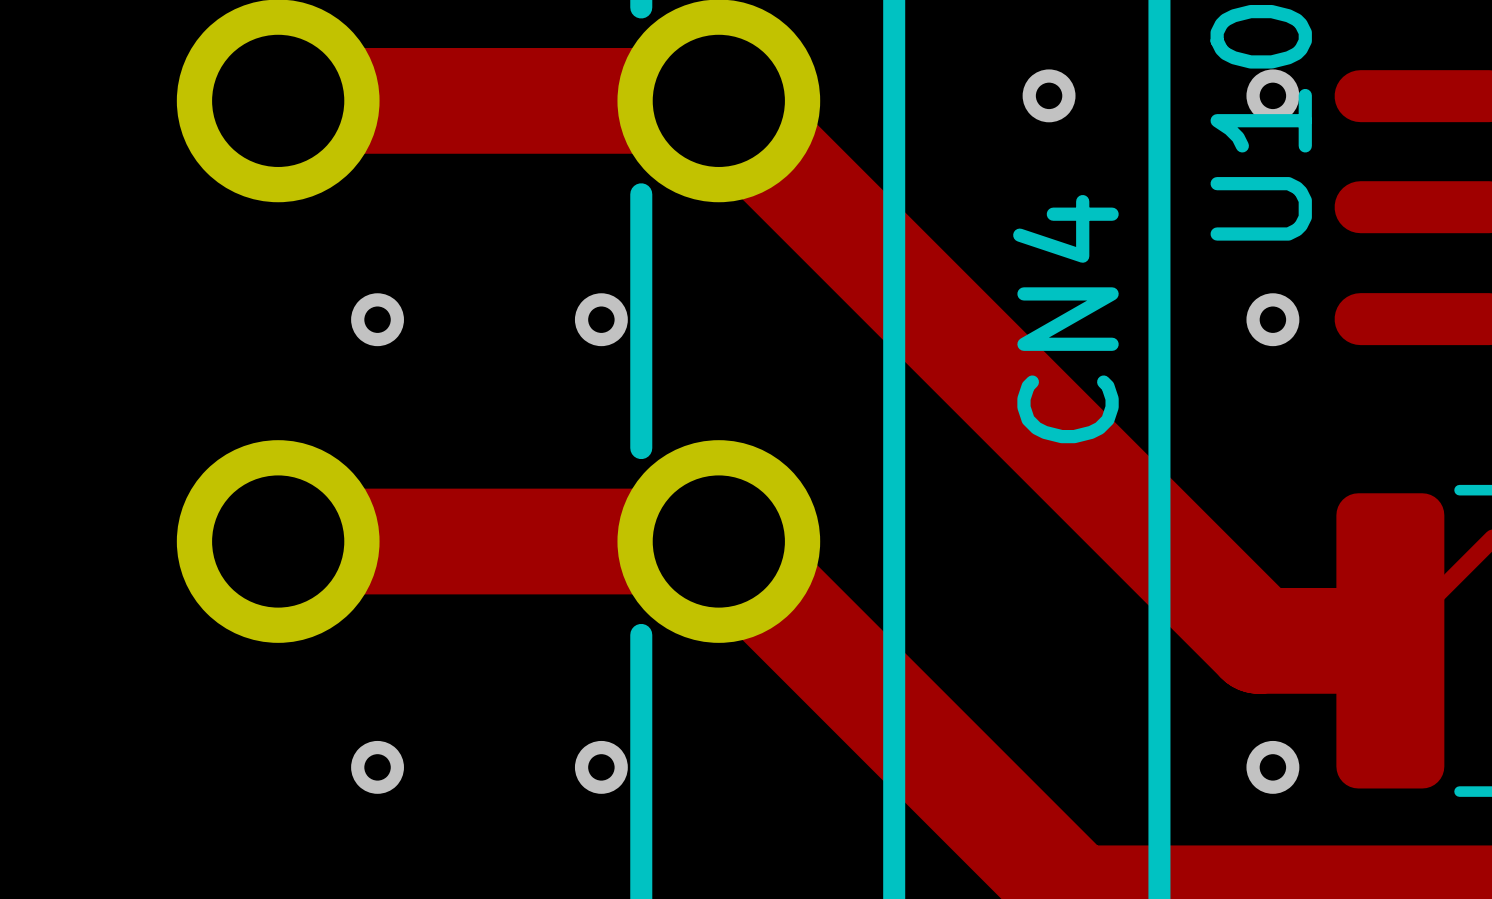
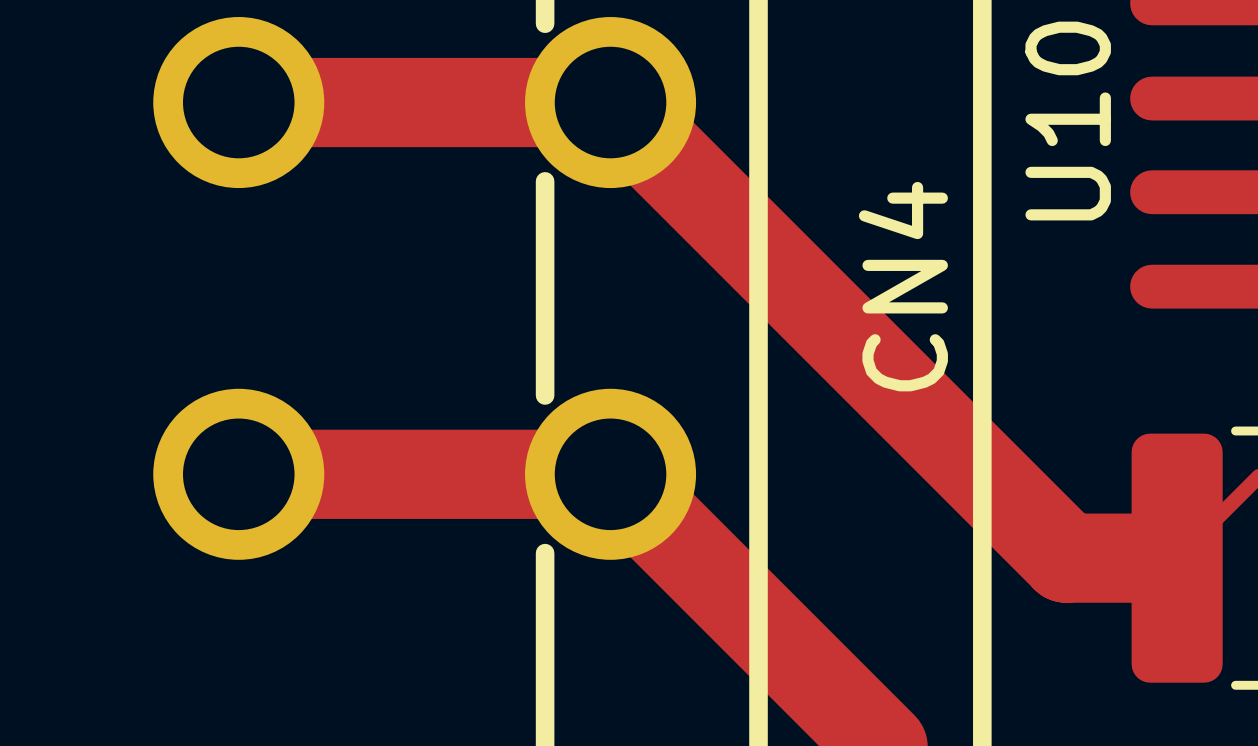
via: (1049, 95) -> none
via: (1272, 95) -> none
via: (377, 319) -> none
via: (601, 319) -> none
via: (1272, 319) -> none
via: (377, 767) -> none
via: (601, 767) -> none
via: (1272, 767) -> none

